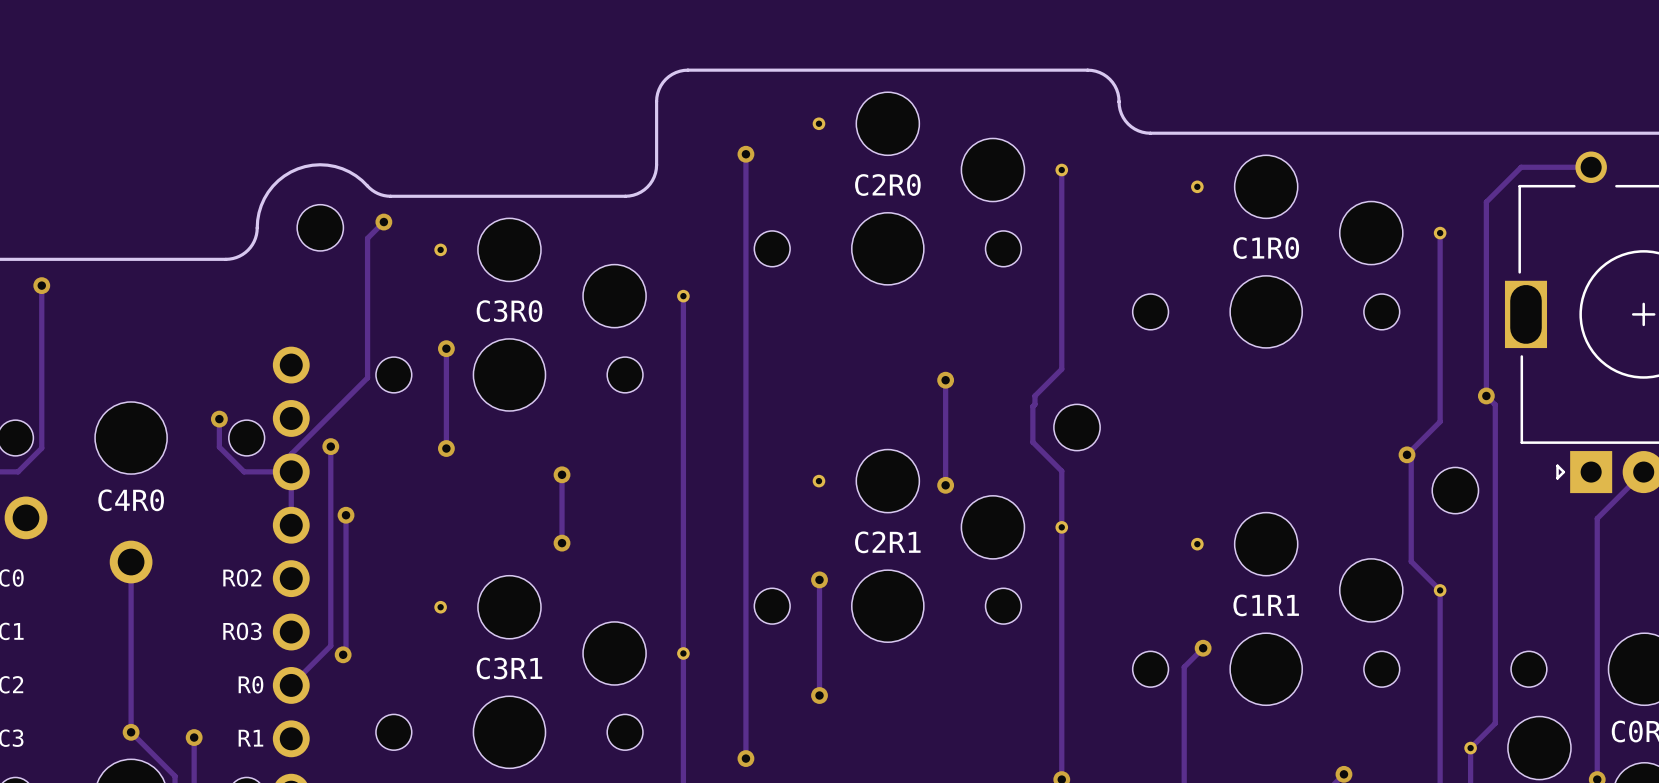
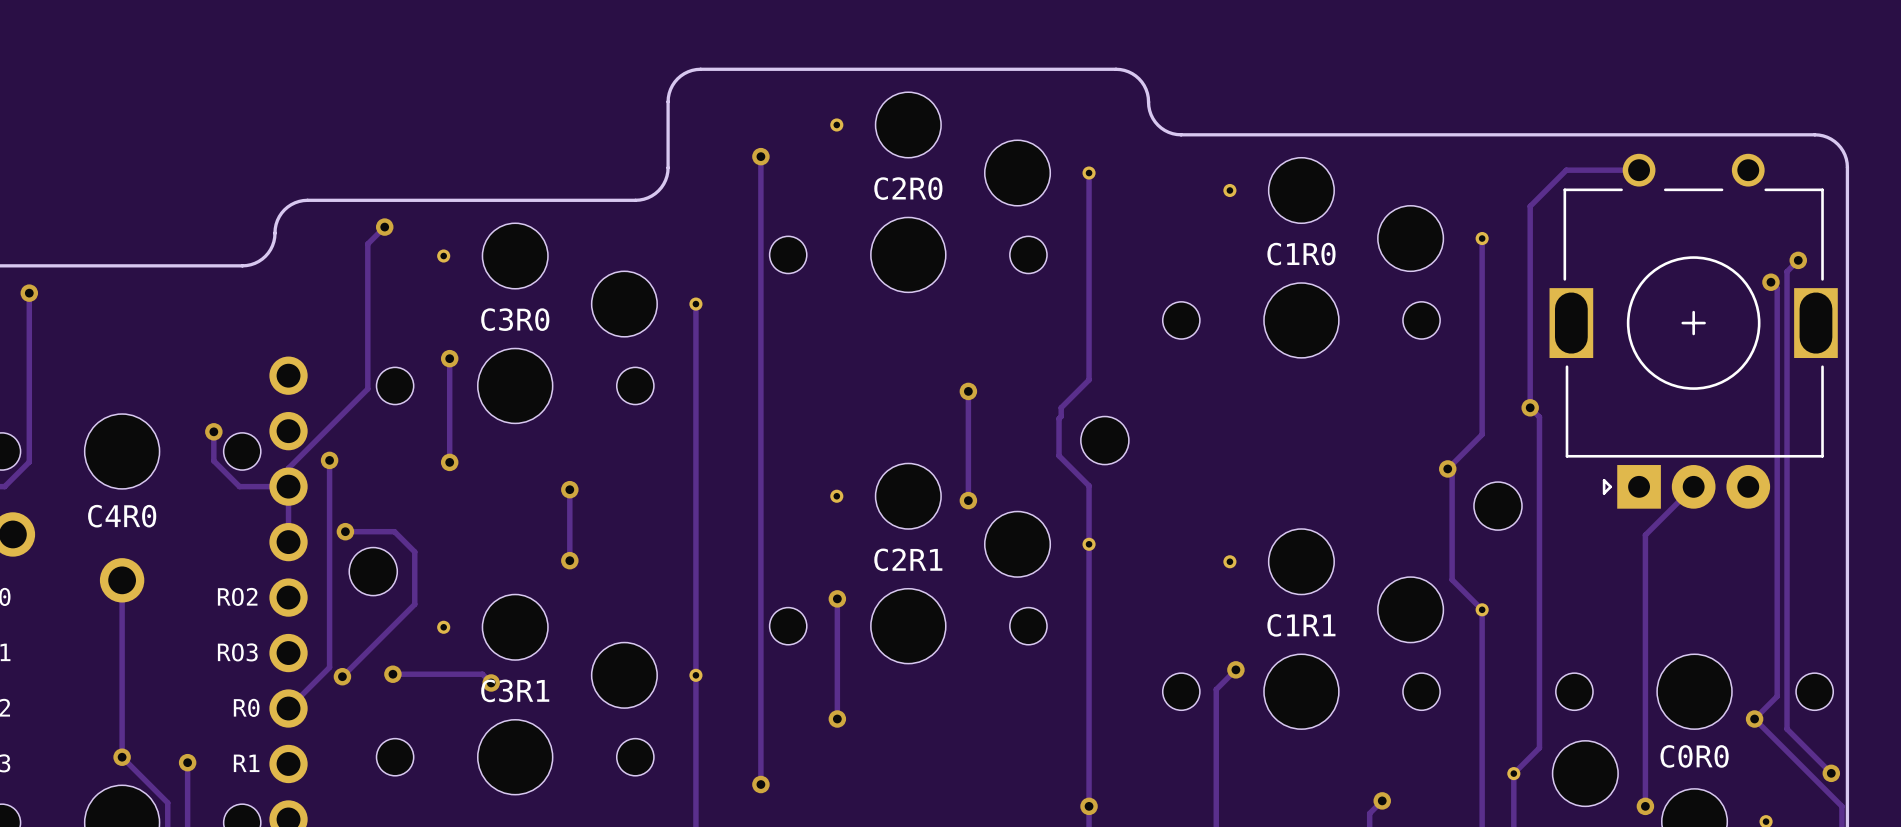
board edge: (390, 196) (374, 192) (355, 175) (335, 166) (320, 164) (297, 168) (284, 176) (268, 192) (261, 205) (256, 234) (250, 247) (239, 256) (225, 259) -> (391, 200) (299, 201) (291, 204) (281, 213) (277, 220) (274, 232)
part position: (320, 227) -> (373, 571)
board edge: none -> (274, 233) (270, 249) (258, 261) (246, 265) (220, 265)
track: (346, 515) (346, 651) -> (345, 531) (394, 531) (414, 551) (414, 604) (345, 673)
track: none -> (392, 674) (482, 674) (491, 682)
via: none -> (392, 674)
via: none -> (491, 682)

